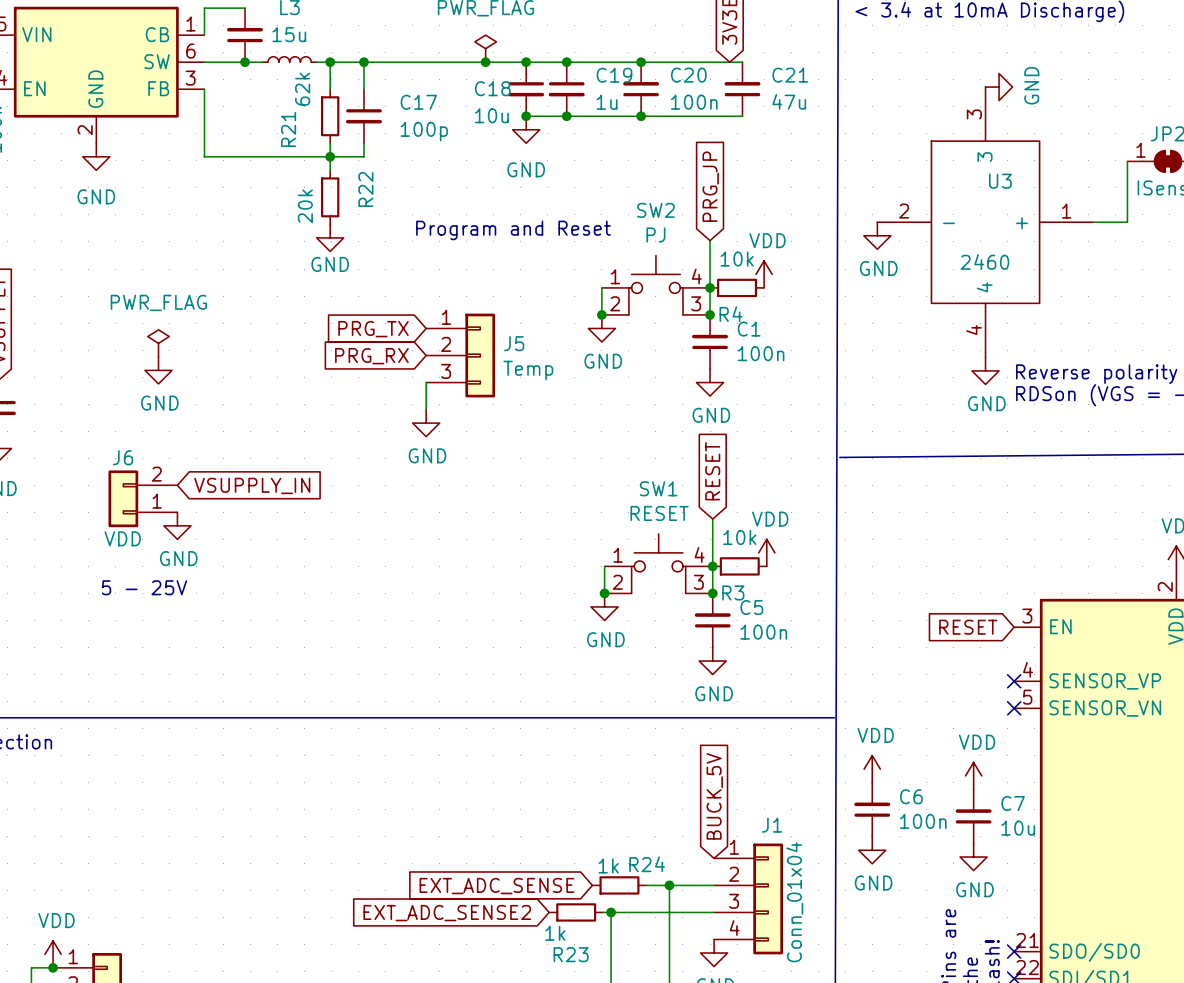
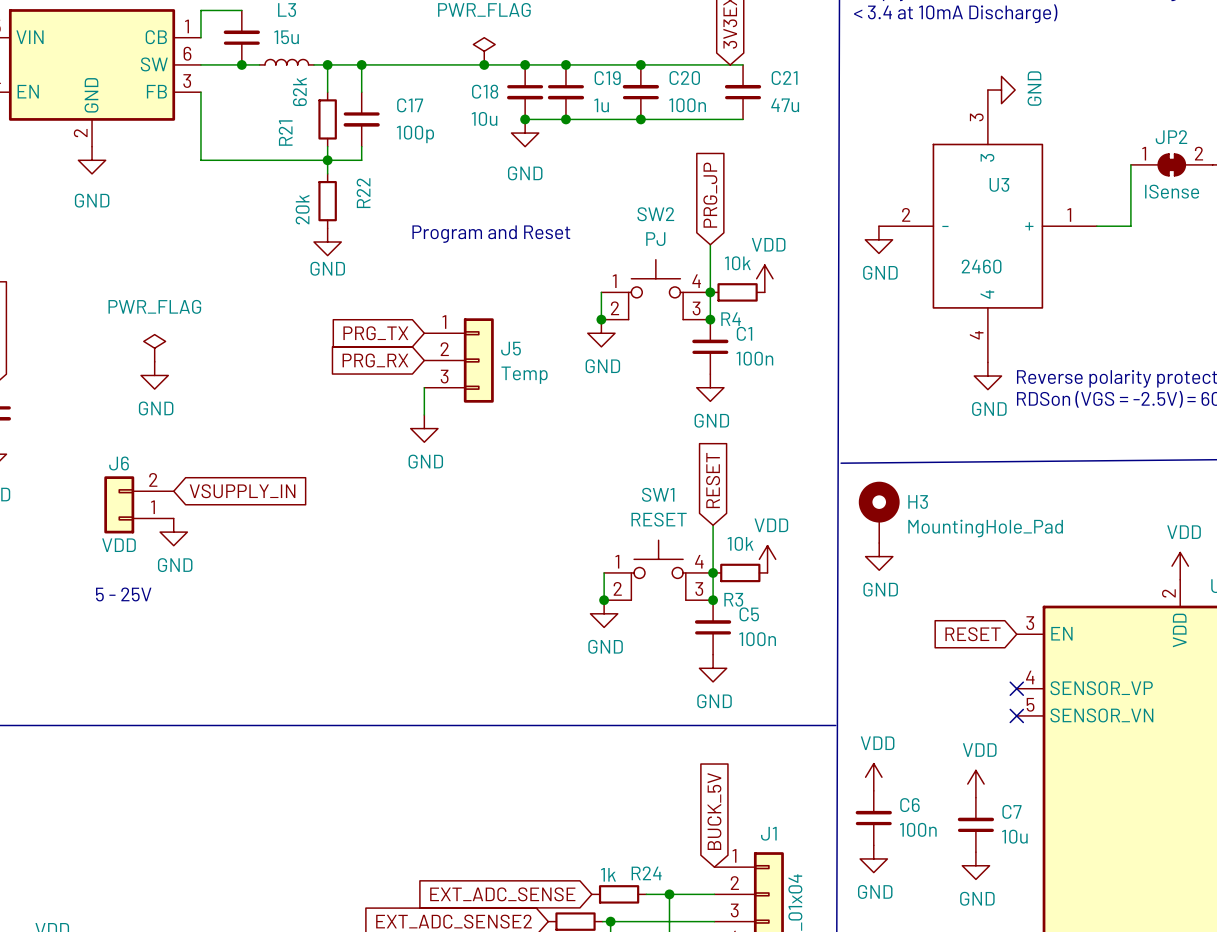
H3: none -> MountingHole_Pad (879, 512)
power symbol: none -> GND (879, 556)

